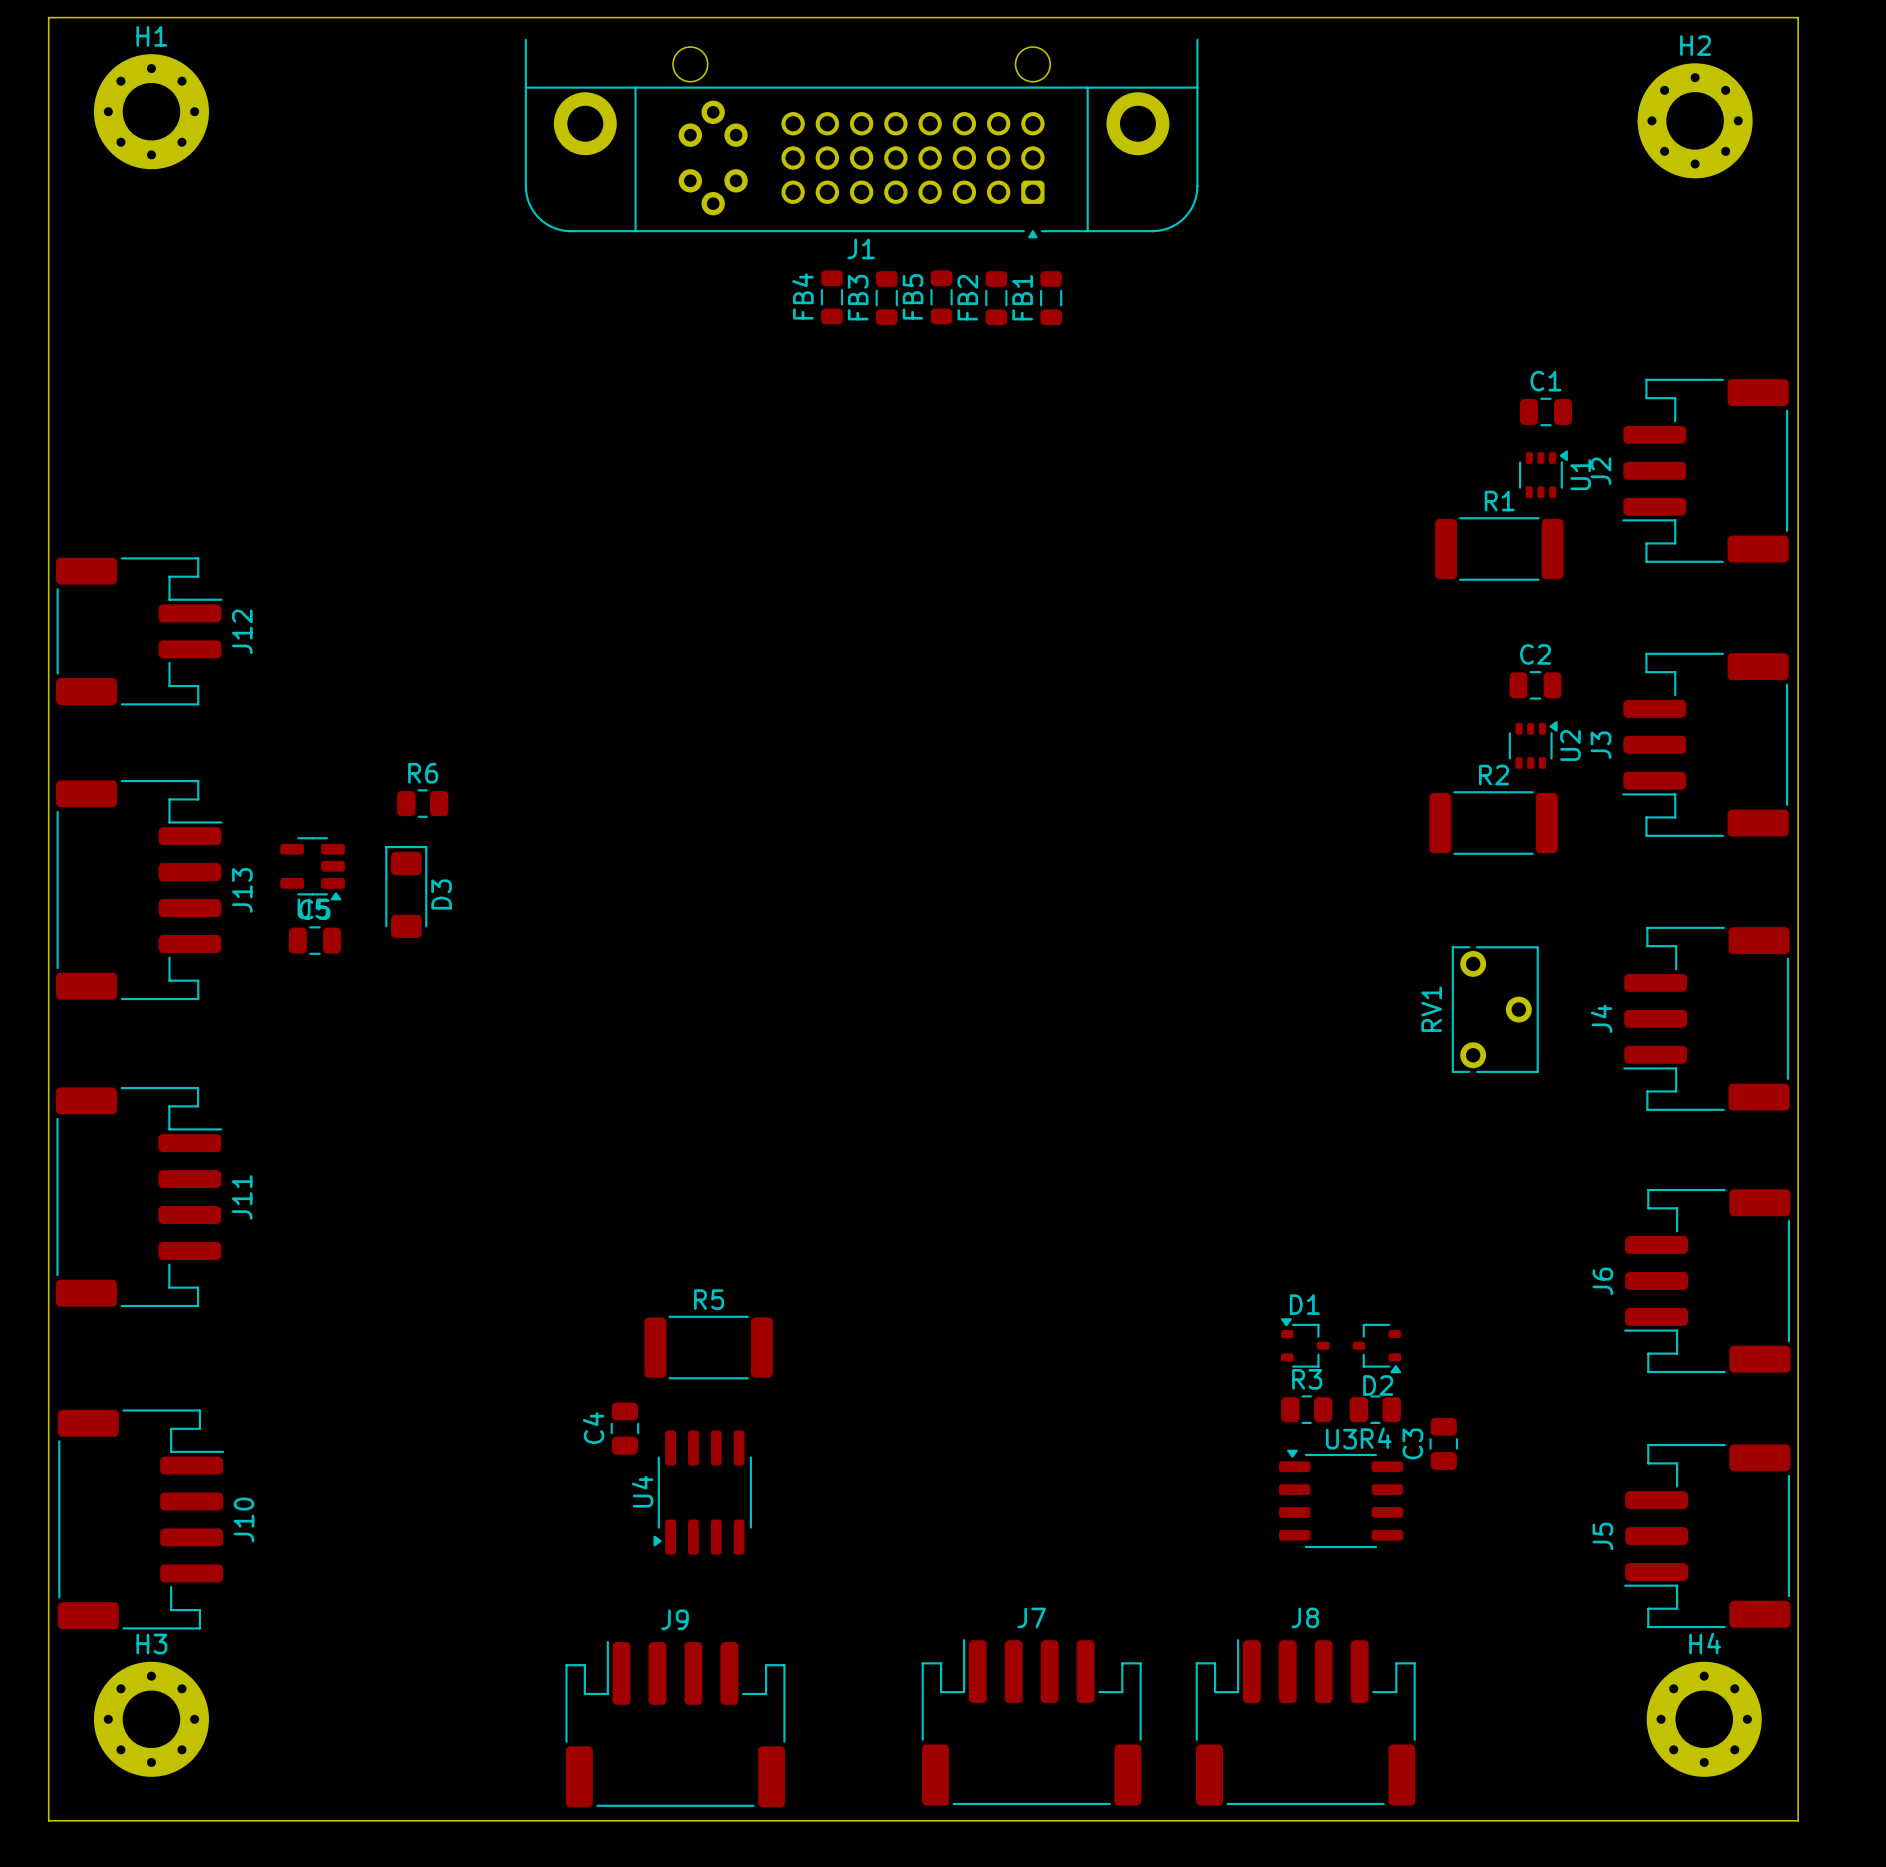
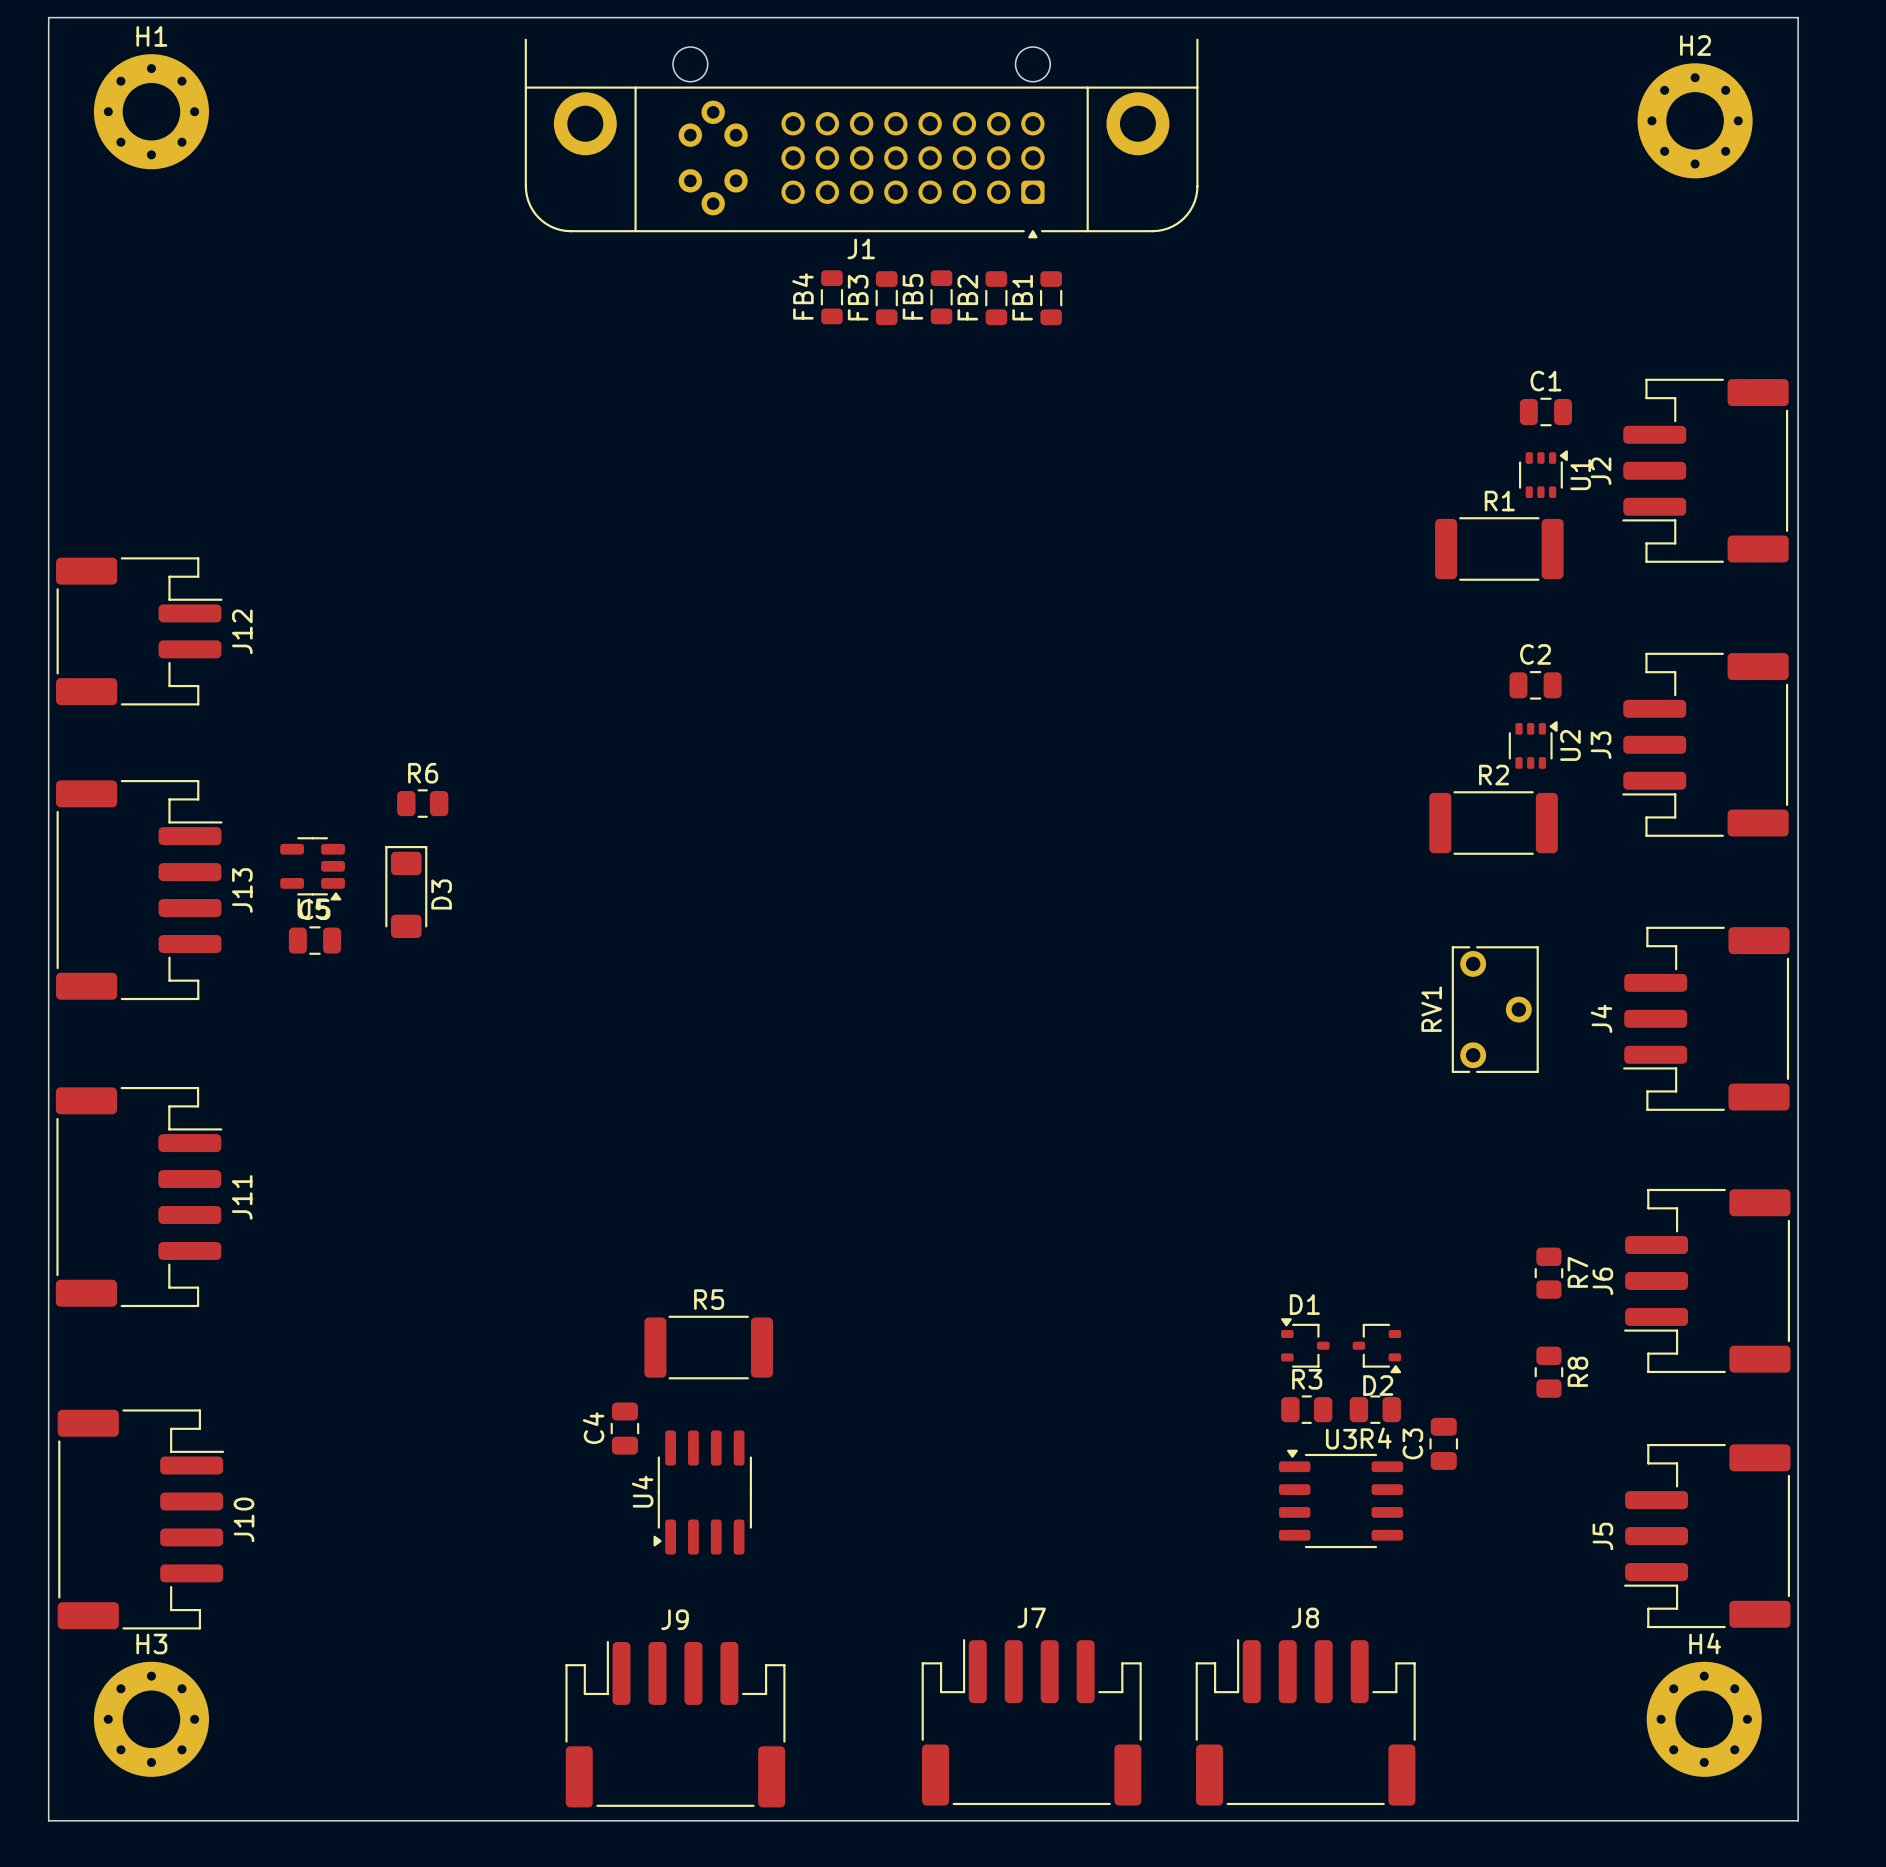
R7: none -> (1548, 1273)
R8: none -> (1548, 1372)

